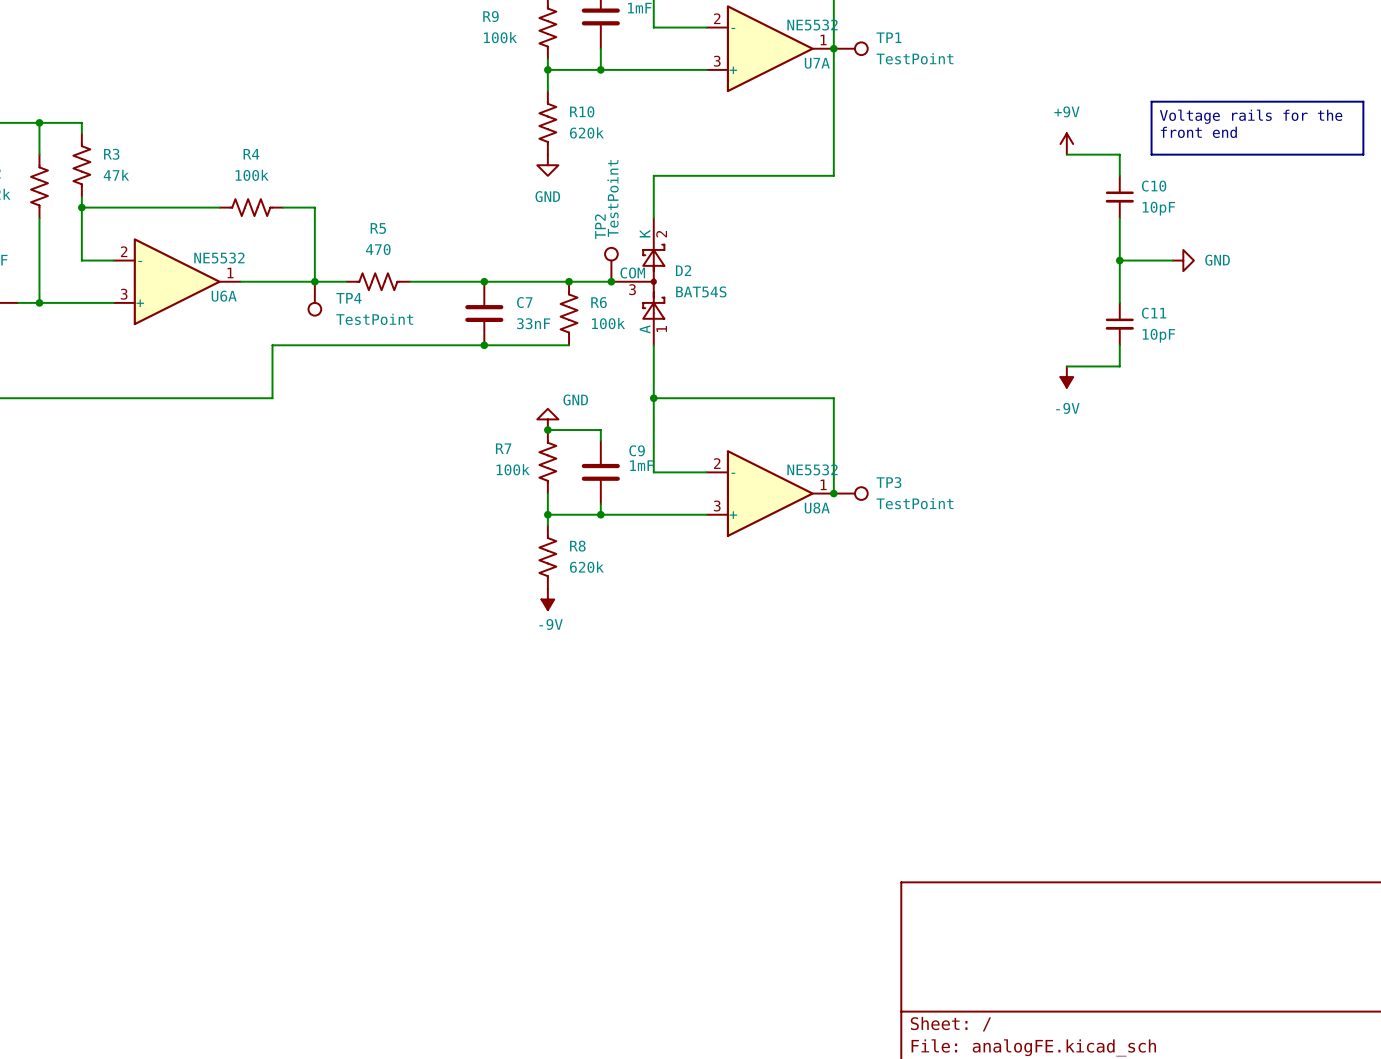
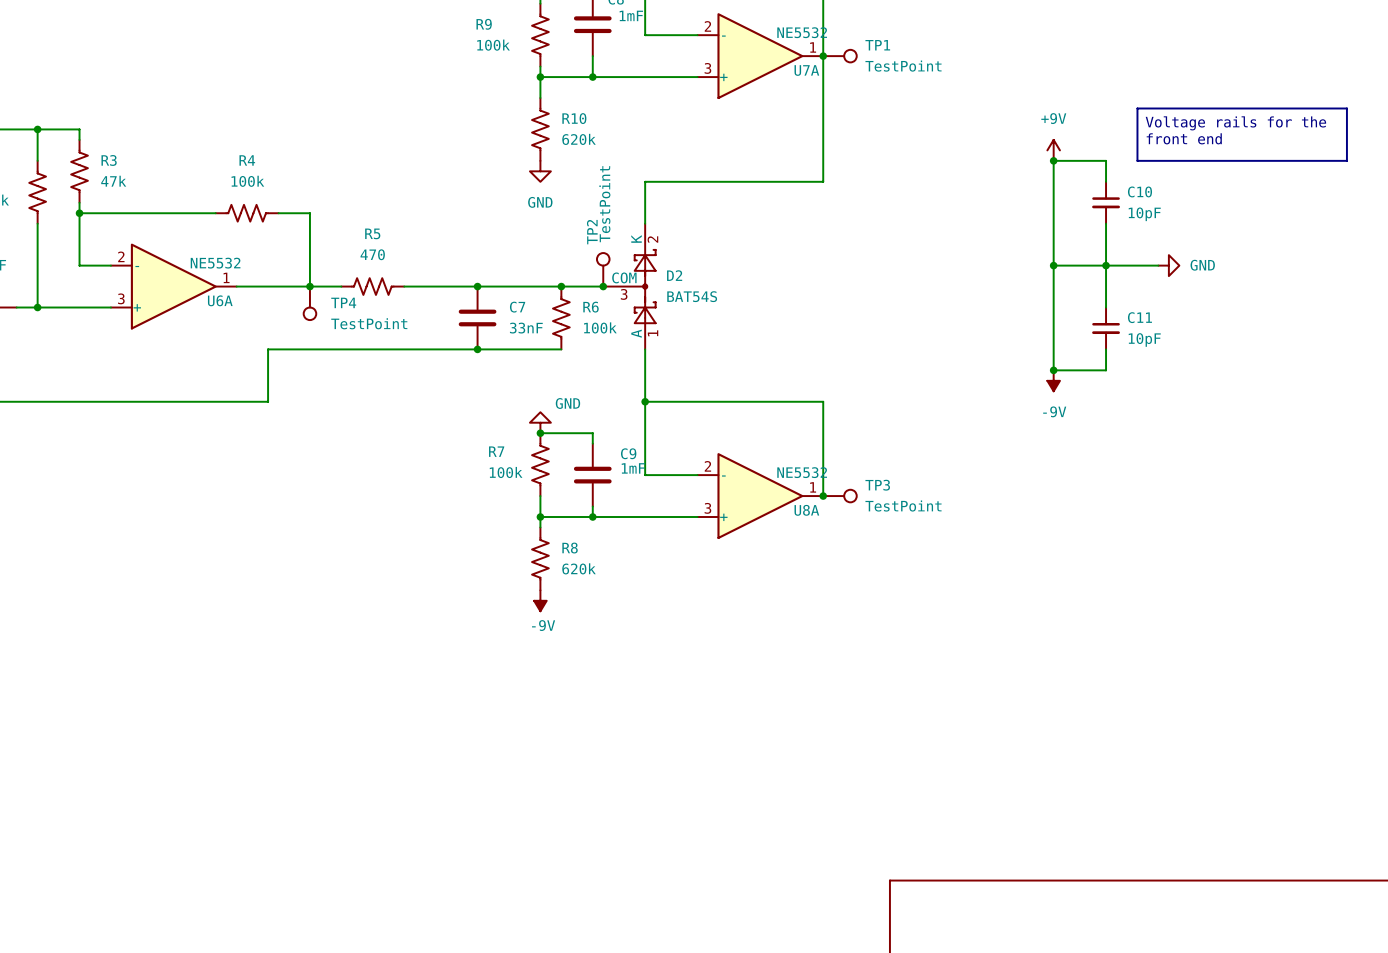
wire: none -> (1053, 160) (1053, 370)
junction: none -> (1053, 160)
wire: none -> (1053, 265) (1106, 265)
junction: none -> (1053, 265)
junction: none -> (1053, 370)

